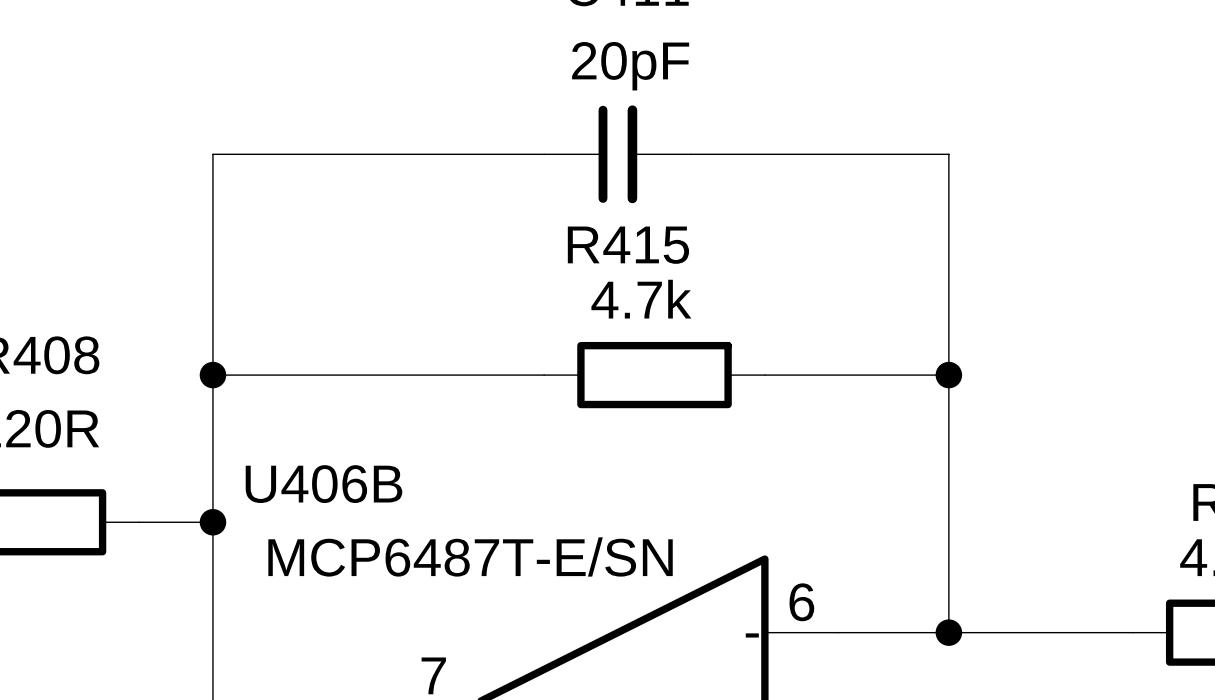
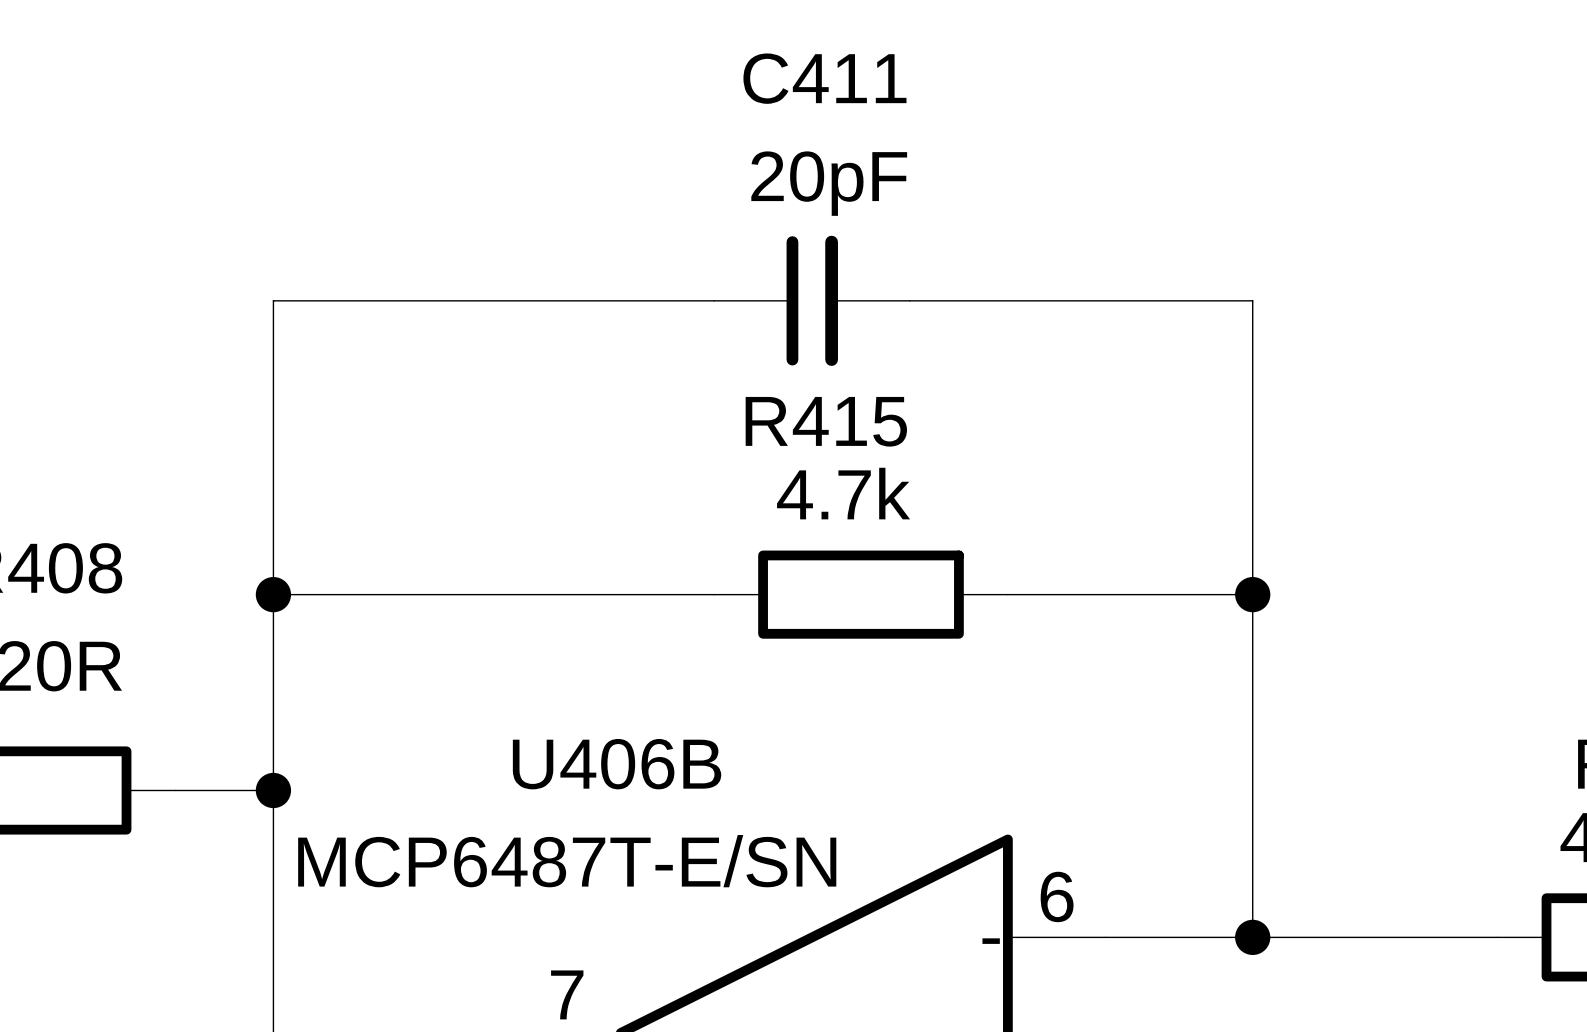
U406B name position: U406B (324, 484) -> U406B (617, 764)
U406B value position: MCP6487T-E/SN (470, 556) -> MCP6487T-E/SN (567, 861)

